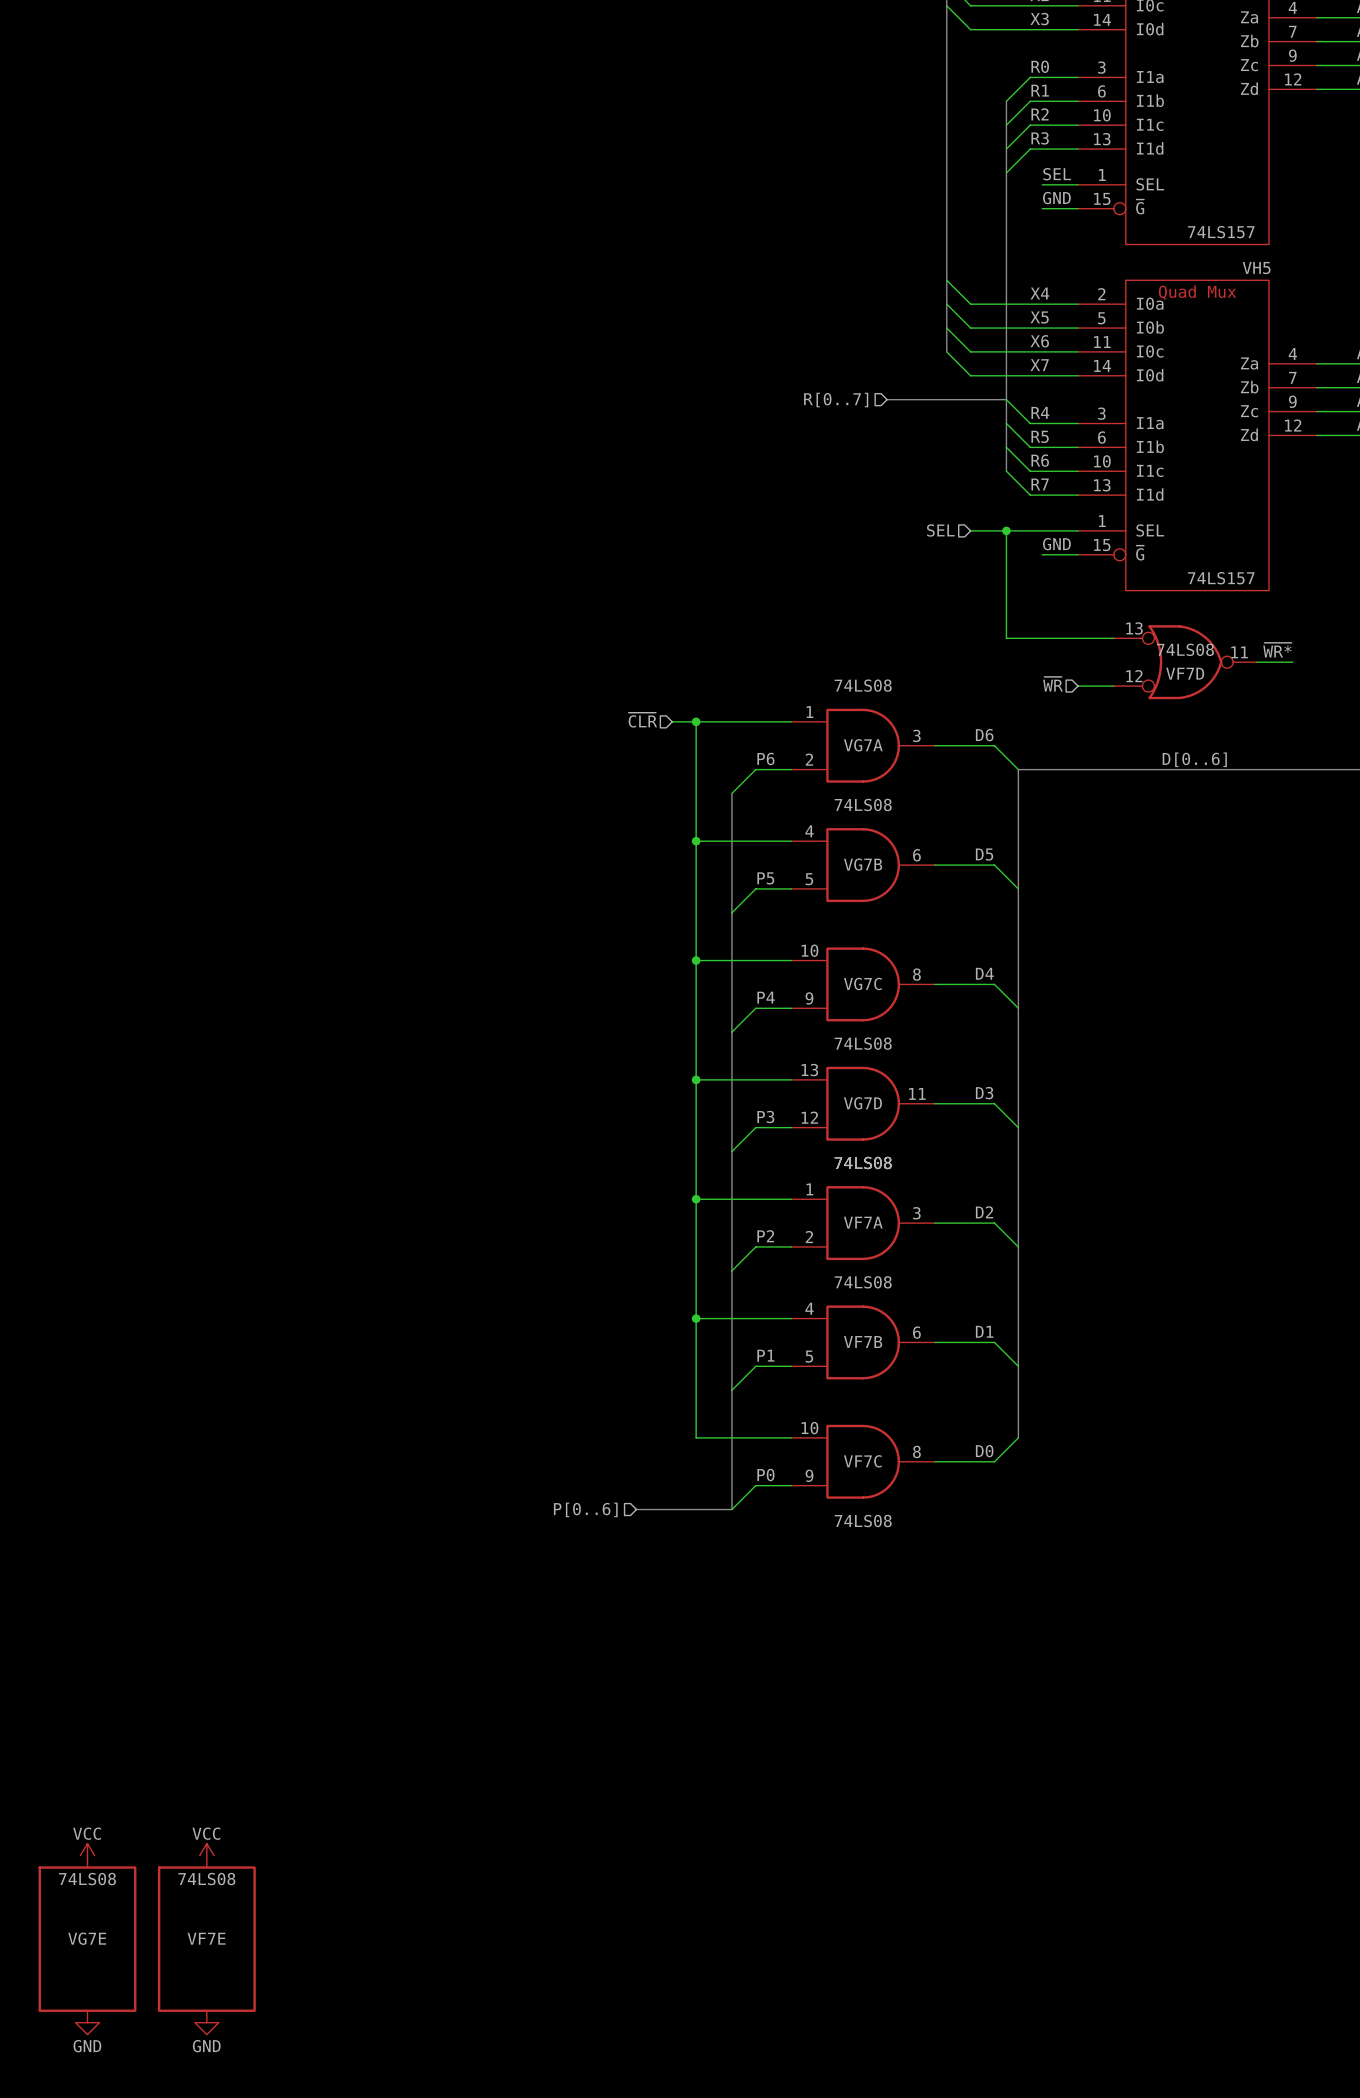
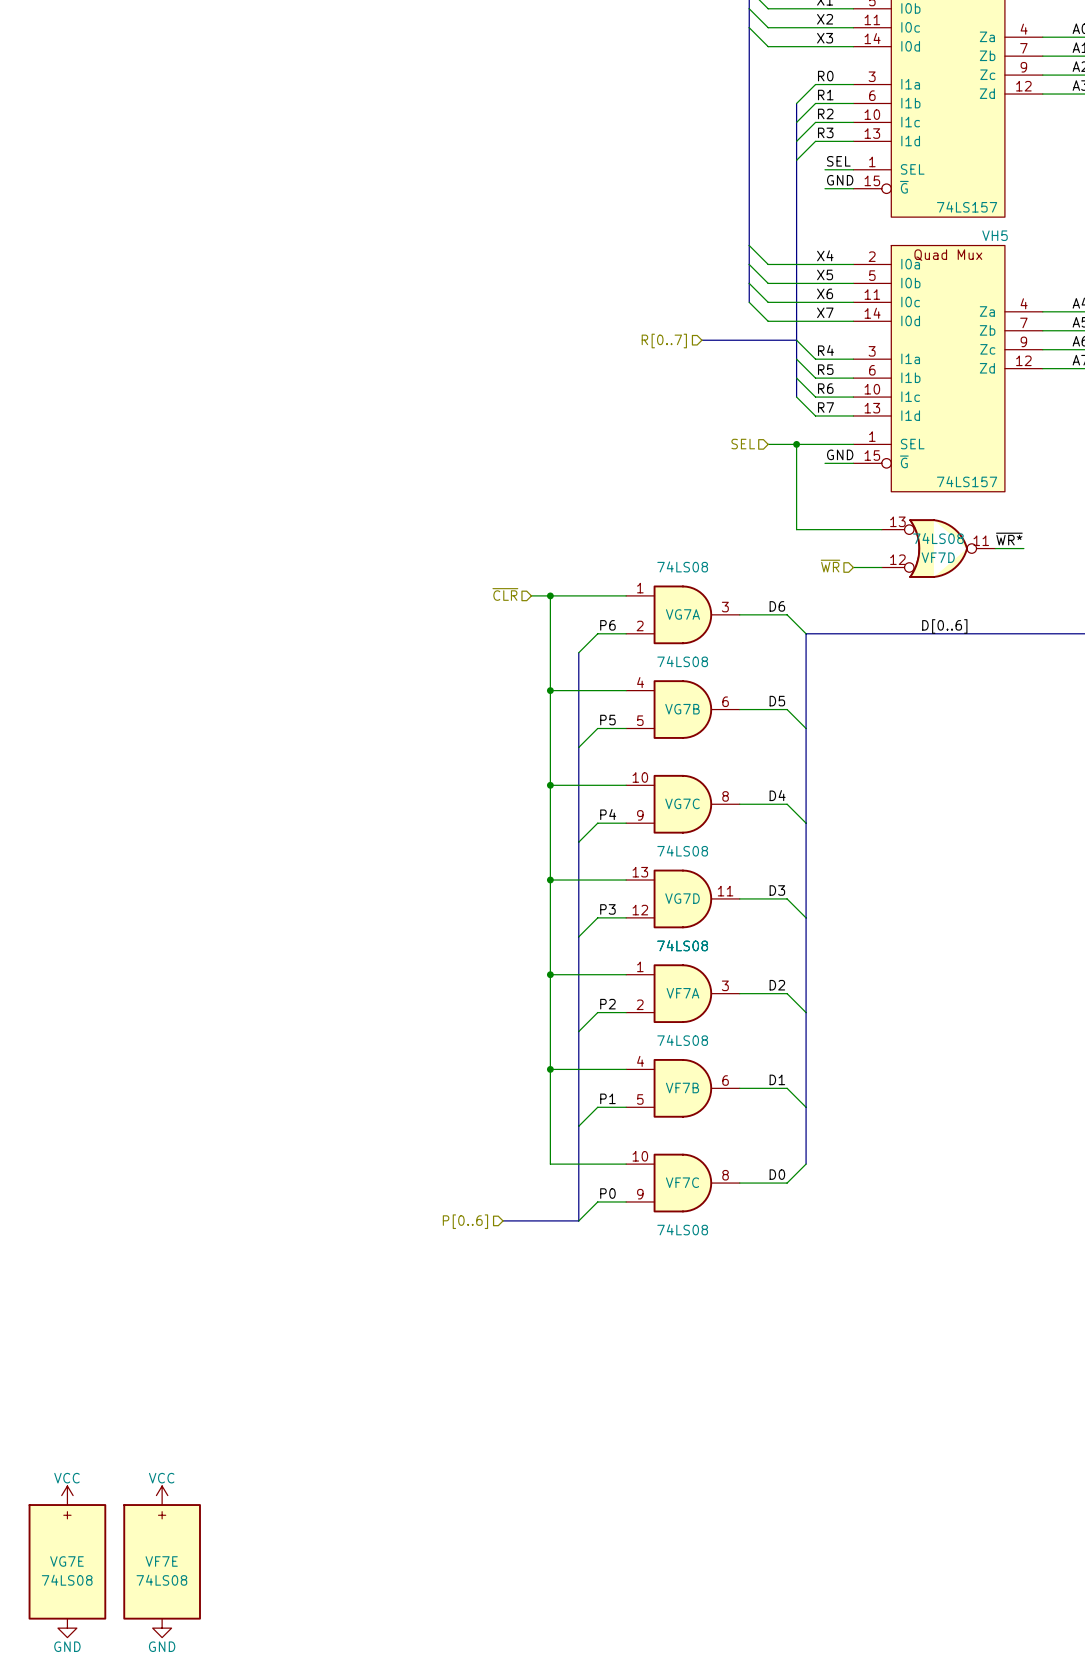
VG7E text: none -> + (67, 1515)
VG7E value position: 74LS08 (87, 1879) -> 74LS08 (67, 1580)
VF7E text: none -> + (162, 1515)
VF7E value position: 74LS08 (206, 1879) -> 74LS08 (161, 1580)

